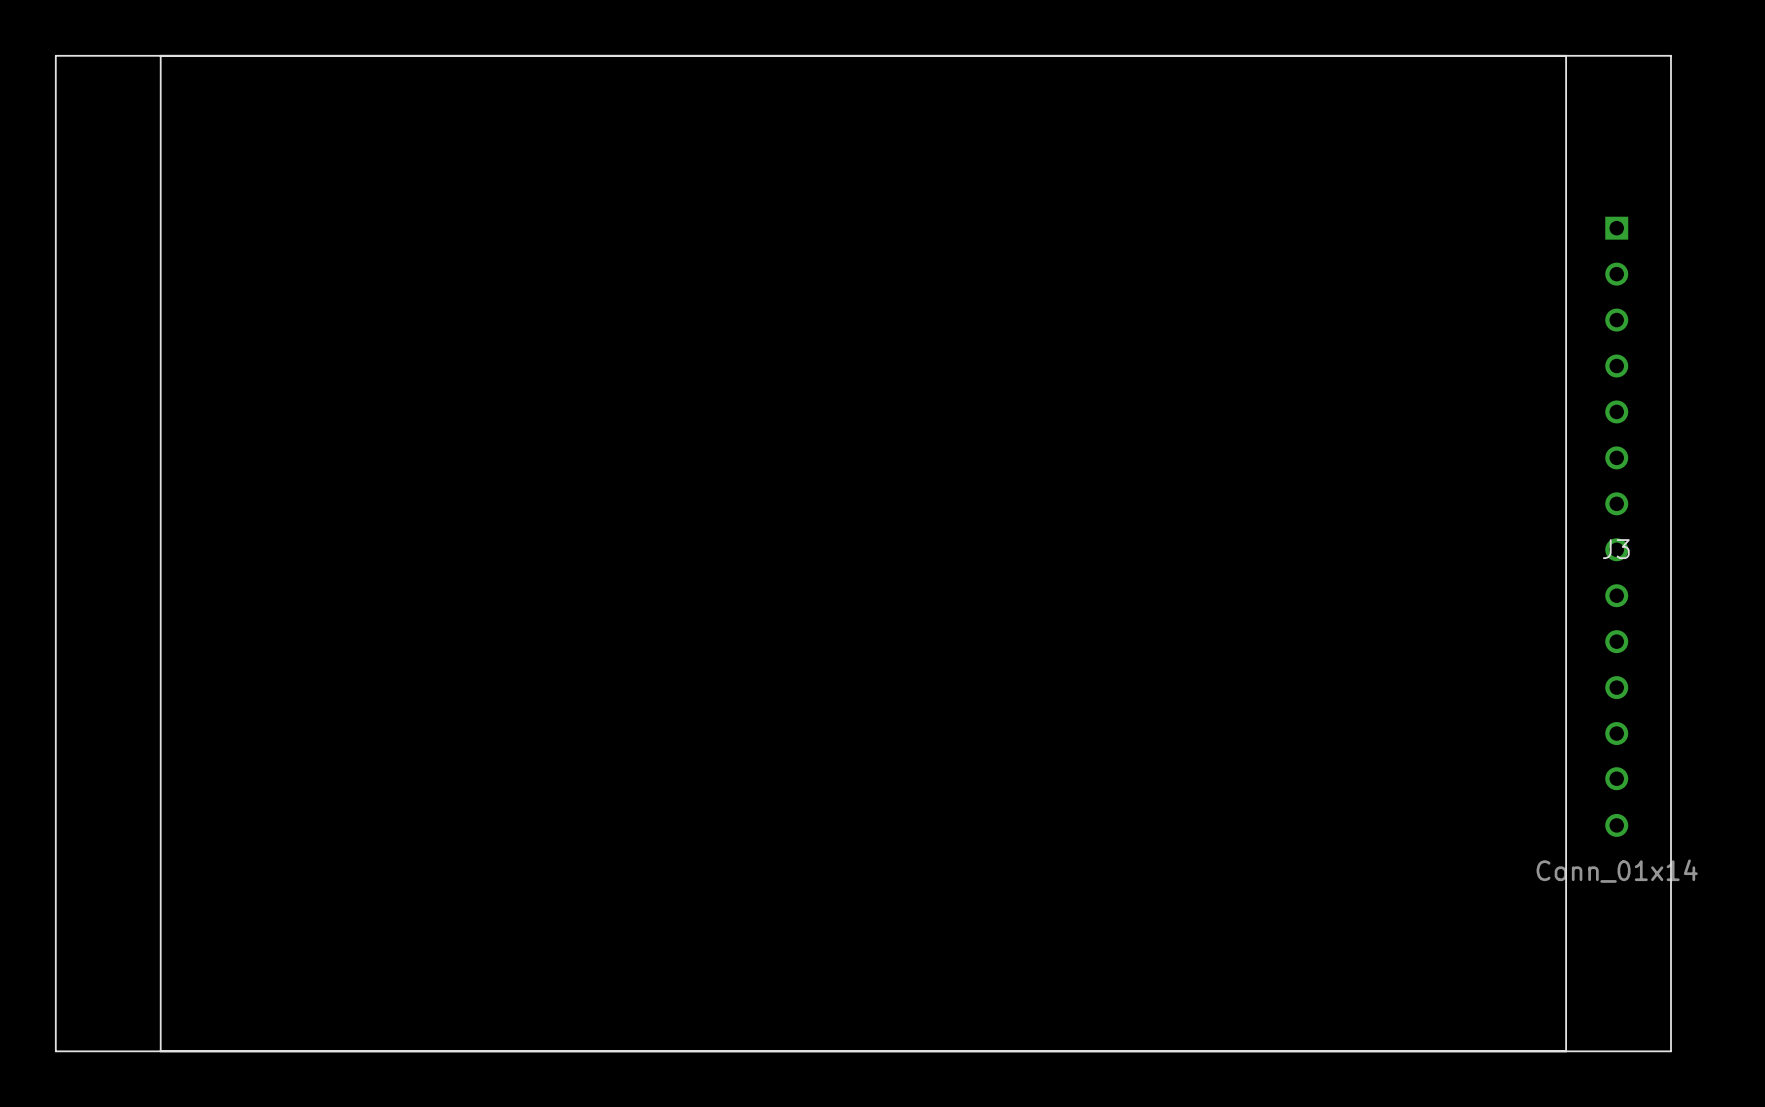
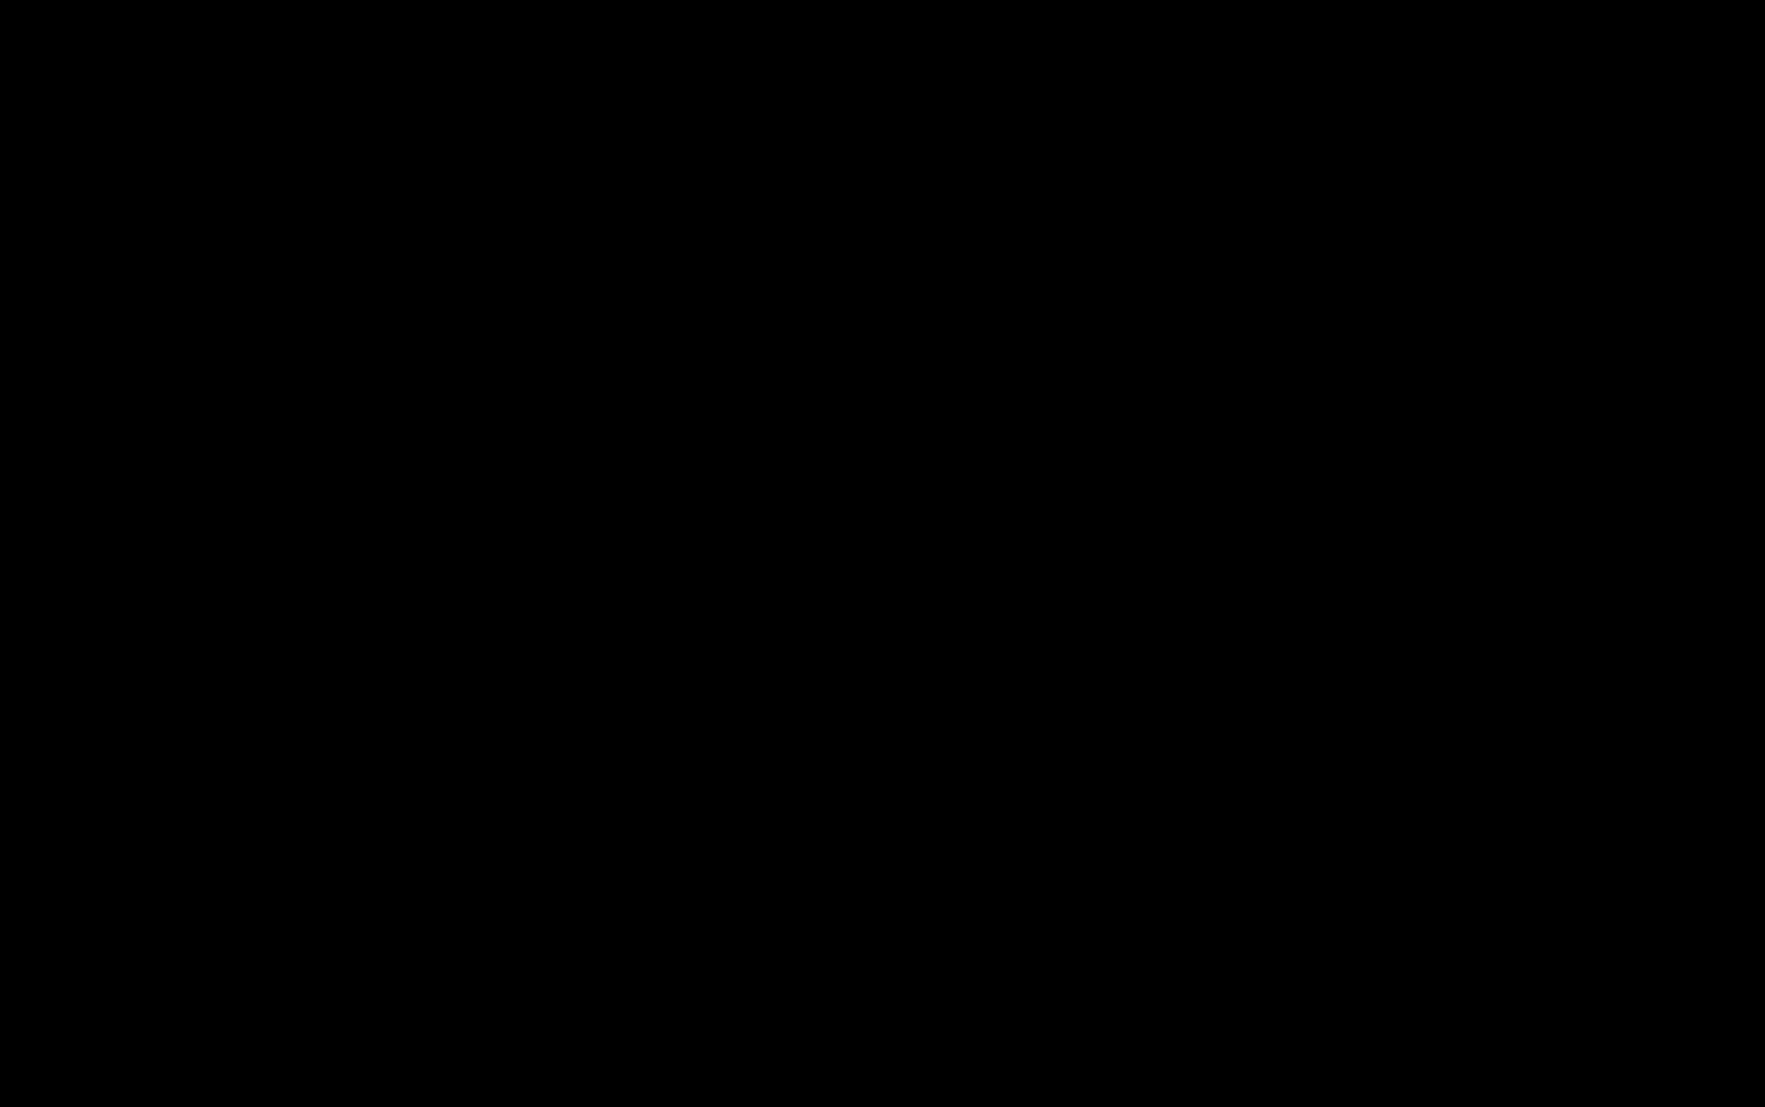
line: (55, 55) (1670, 55) (1670, 1051) (55, 1051) (55, 55) -> none
line: (160, 55) (160, 1051) -> none
line: (1566, 55) (1566, 1051) -> none
J3: Conn_01x14 (1616, 526) -> none

